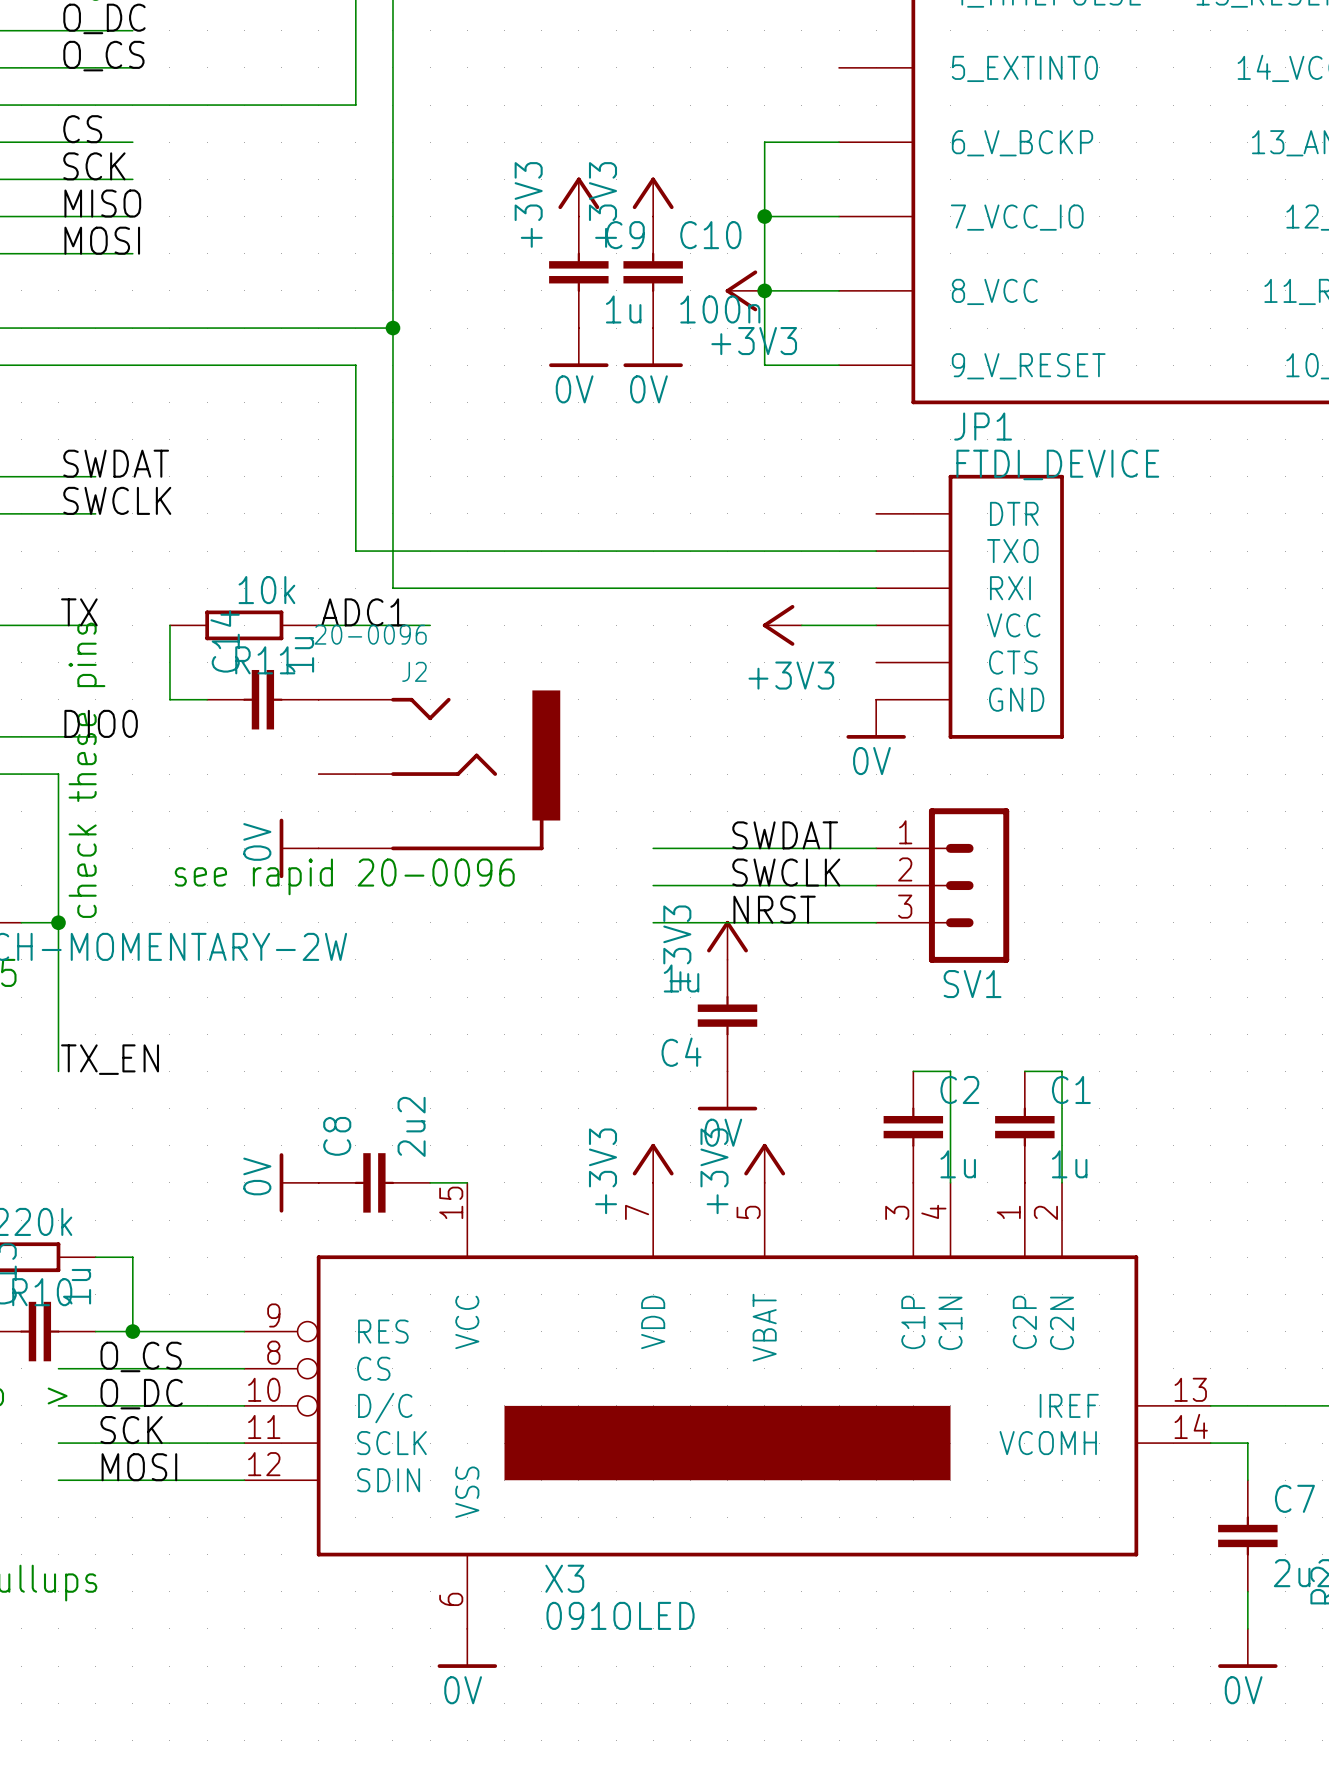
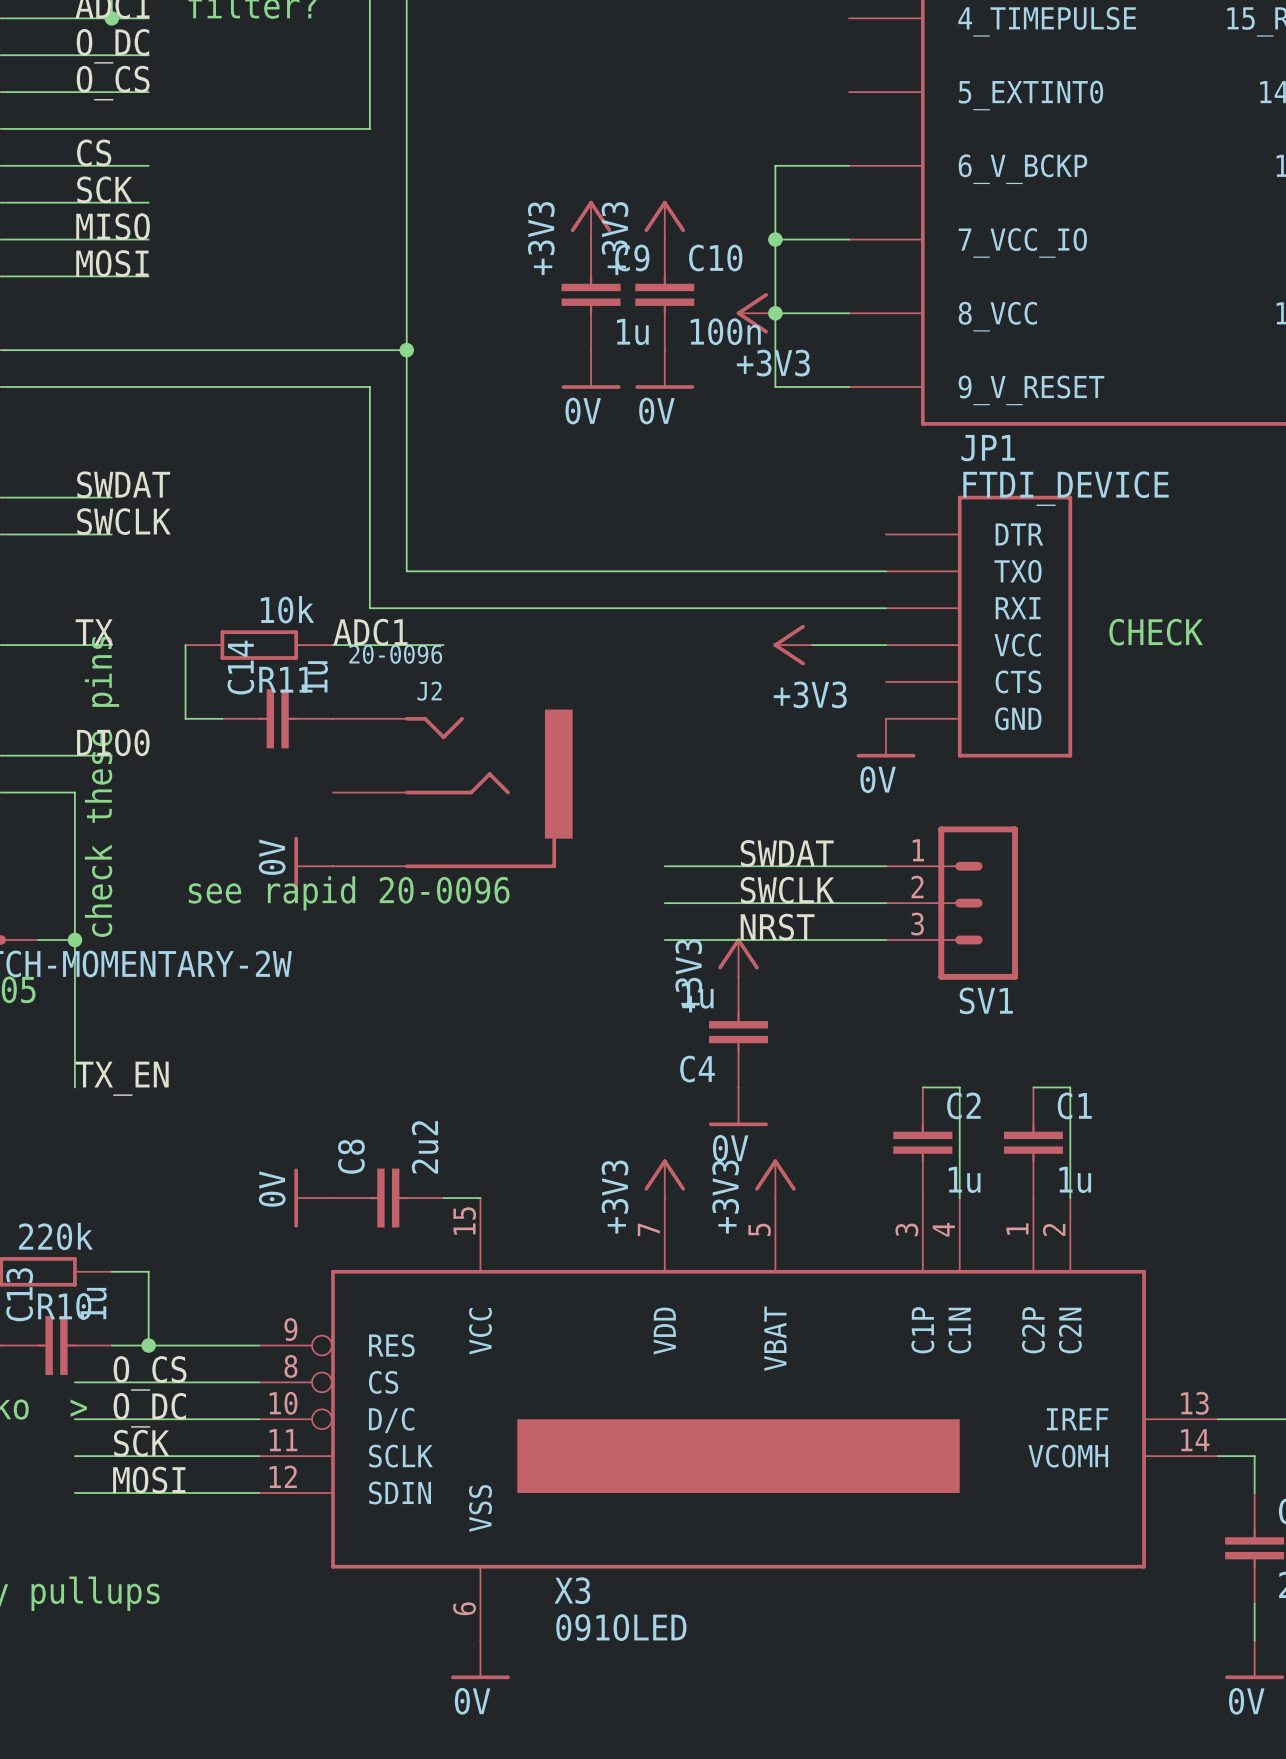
wire: (355, 551) (392, 551) (392, 588) -> (369, 571) (369, 608) (406, 608)
text: none -> CHECK (1156, 632)

